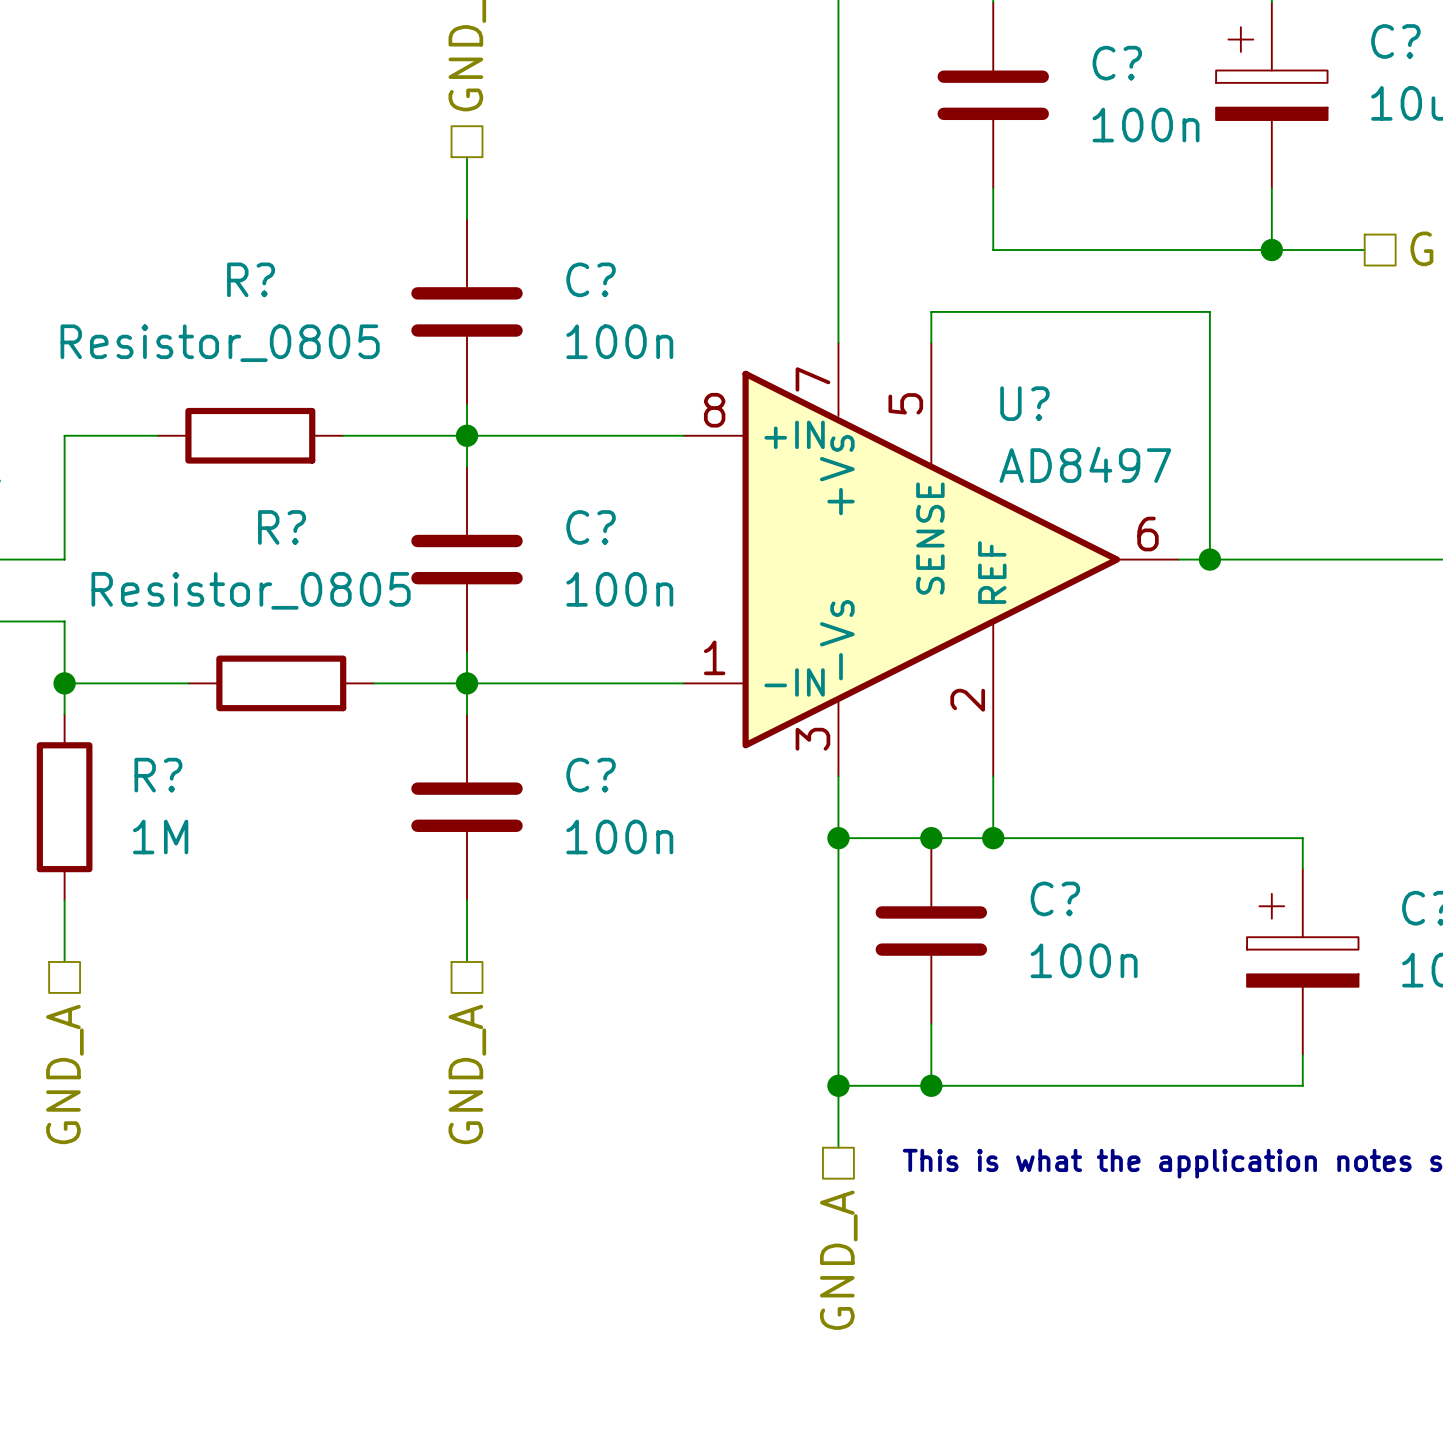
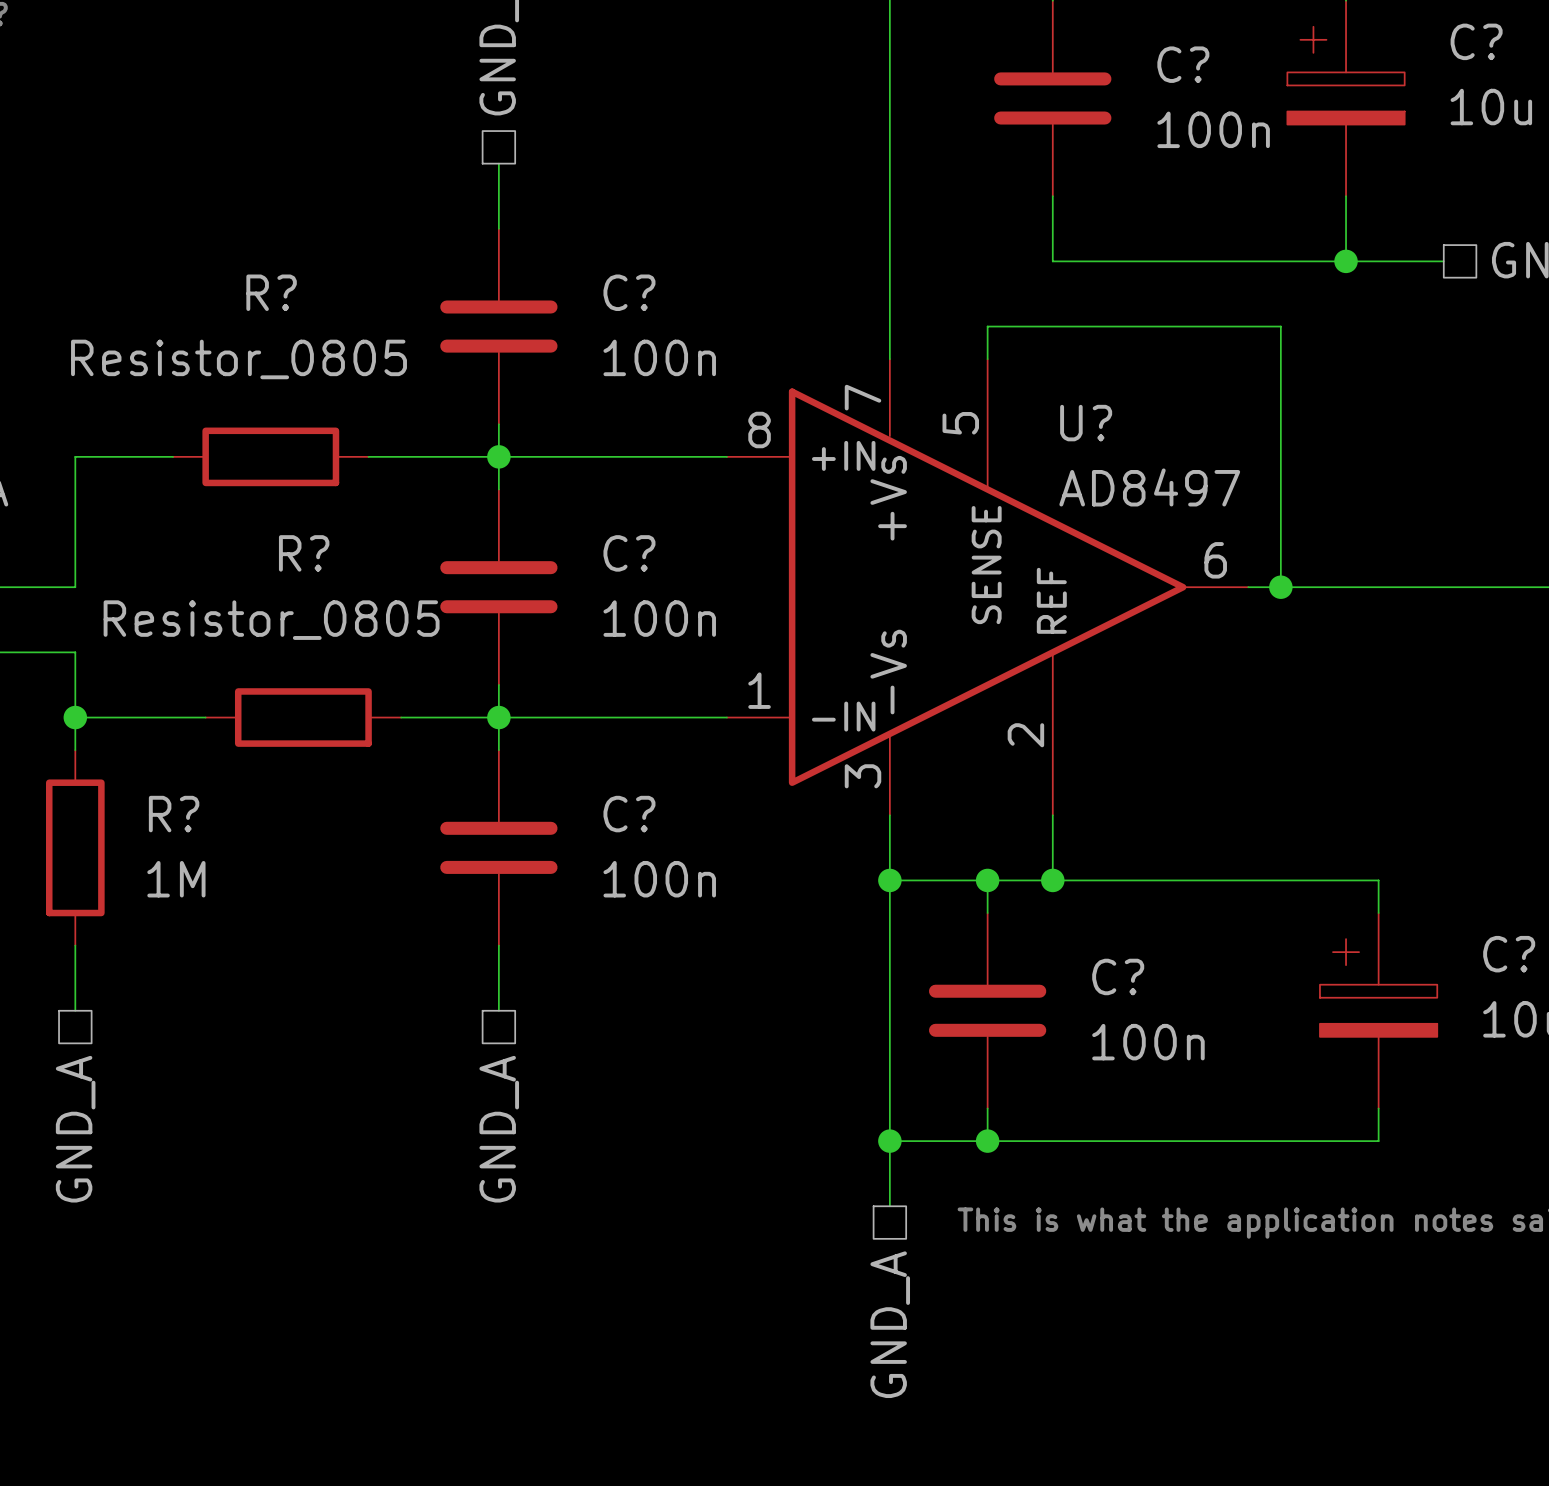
C? position: (931, 931) -> (987, 1010)

